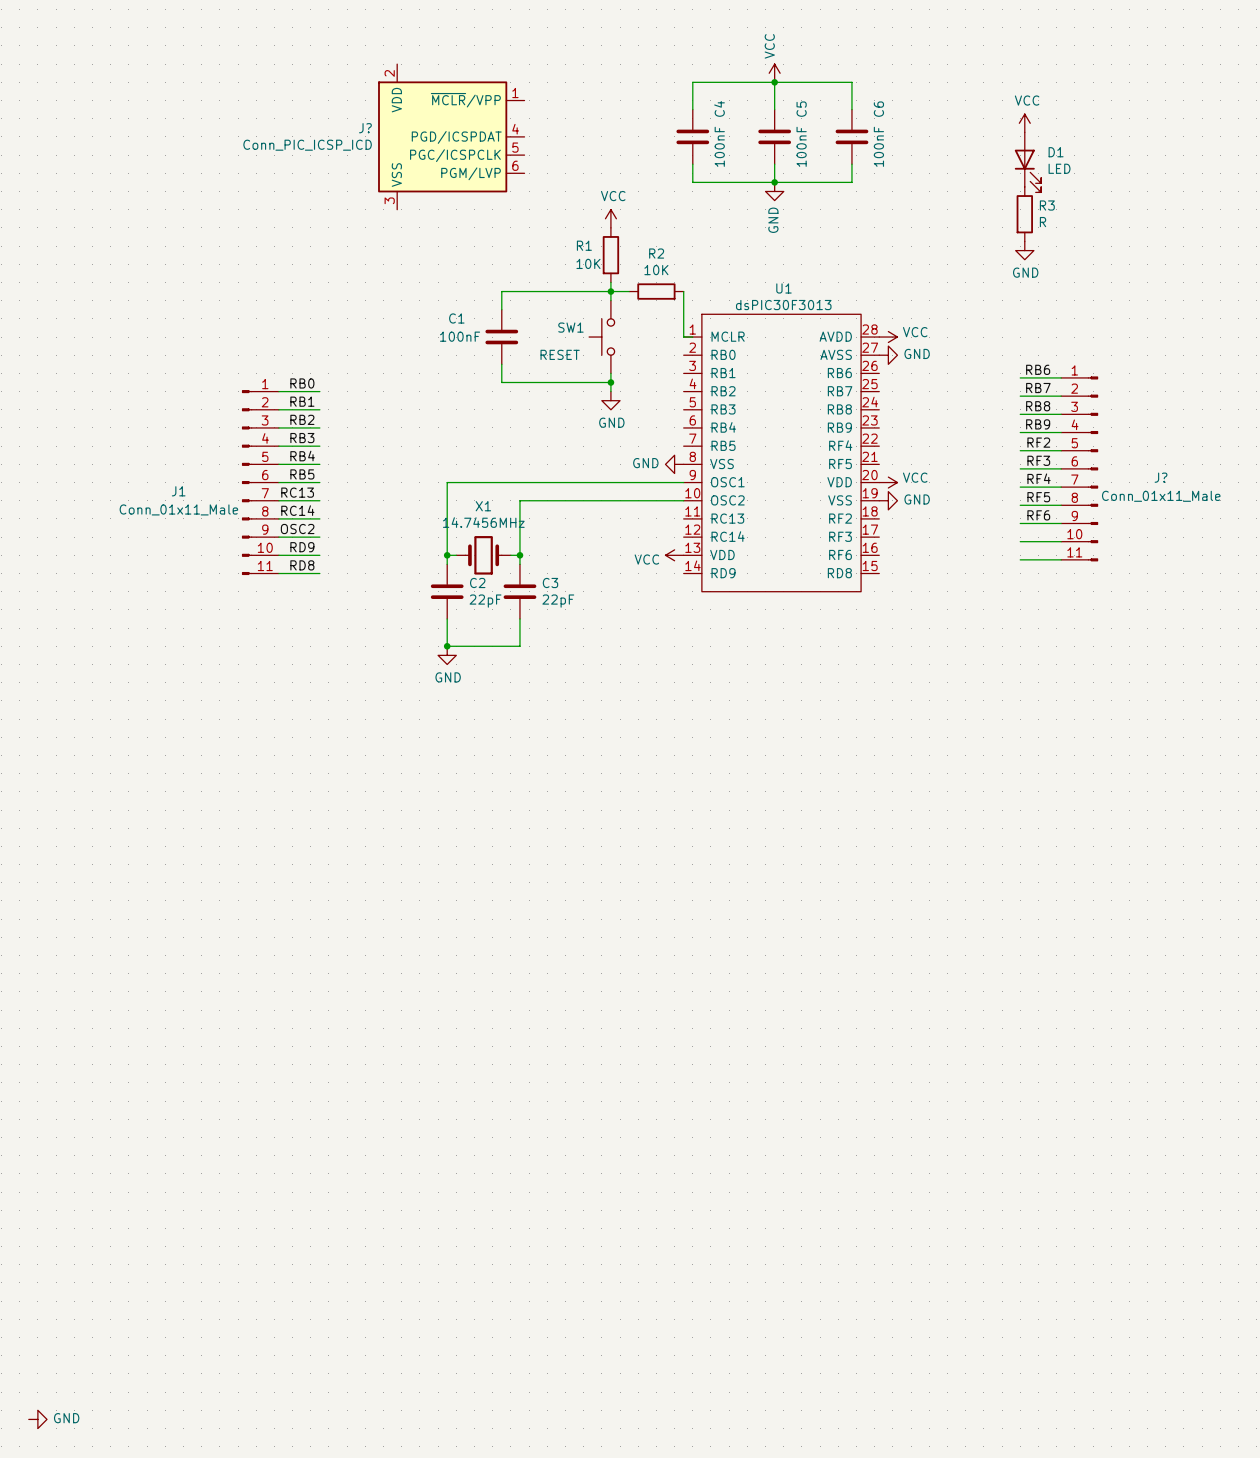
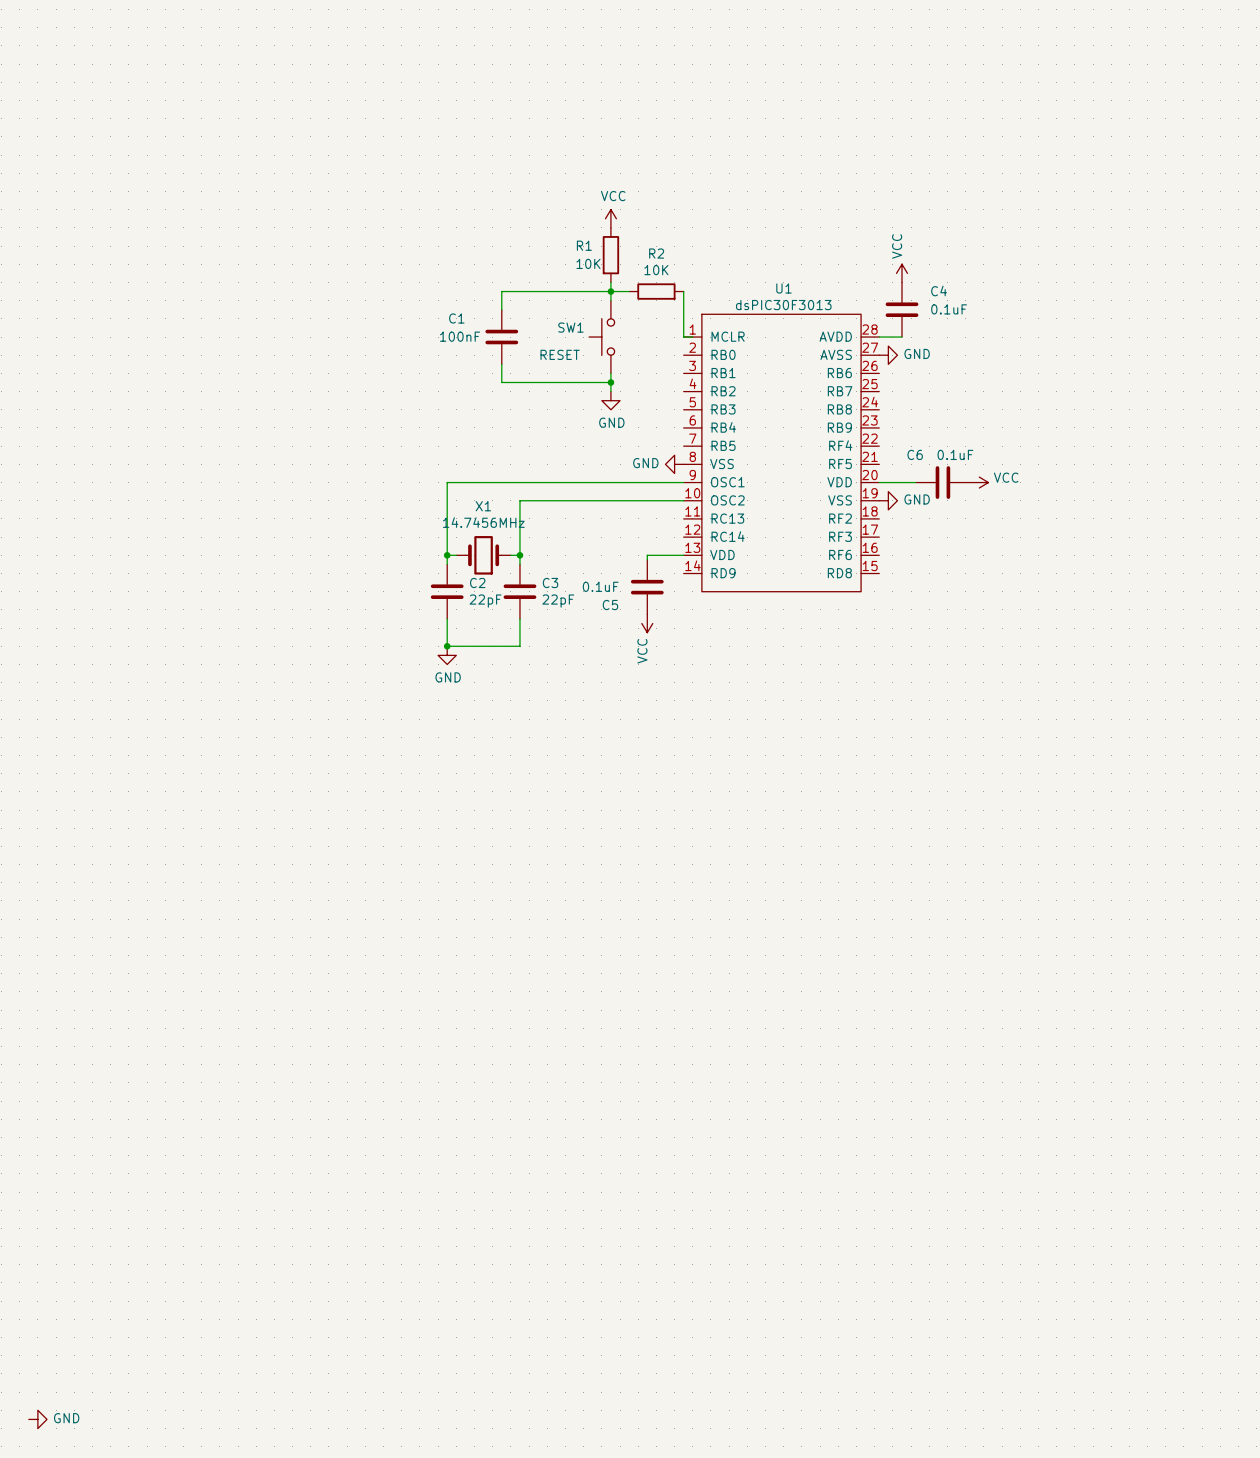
power symbol: VCC (774, 73) -> none
wire: (774, 82) (774, 109) -> none
junction: (774, 82) -> none
C4 name rotation: 0° (719, 108) -> 90° clockwise (939, 290)
wire: (692, 109) (692, 82) (851, 82) (851, 109) -> none
C5 name rotation: 0° (801, 109) -> 90° clockwise (610, 605)
C5 name position: C5 (801, 109) -> C5 (610, 605)
C6 name position: C6 (878, 109) -> C6 (915, 454)
power symbol: VCC (1024, 123) -> none
J?: Conn_PIC_ICSP_ICD (451, 136) -> none
C4 position: (692, 136) -> (902, 309)
C5 position: (774, 136) -> (647, 587)
C6 rotation: 0° (851, 136) -> 90° clockwise (942, 482)
C6 position: (851, 136) -> (942, 482)
C4 value: 100nF (719, 146) -> 0.1uF (949, 309)
C5 value: 100nF (801, 146) -> 0.1uF (600, 586)
C6 value: 100nF (878, 146) -> 0.1uF (955, 454)
D1: LED (1027, 162) -> none
wire: (692, 164) (692, 182) (851, 182) (851, 164) -> none
wire: (774, 164) (774, 182) -> none
junction: (774, 182) -> none
power symbol: GND (774, 191) -> none
R3: R (1024, 214) -> none
power symbol: GND (1024, 250) -> none
power symbol rotation: 0° (888, 337) -> 90° counterclockwise (902, 273)
power symbol position: VCC (888, 337) -> VCC (902, 273)
label: RB6 (1038, 369) -> none
wire: (1020, 377) (1061, 377) -> none
label: RB0 (302, 383) -> none
label: RB7 (1038, 388) -> none
wire: (278, 391) (319, 391) -> none
wire: (1020, 396) (1061, 396) -> none
label: RB1 (302, 401) -> none
label: RB8 (1038, 406) -> none
wire: (278, 409) (319, 409) -> none
wire: (1020, 414) (1061, 414) -> none
label: RB2 (302, 419) -> none
label: RB9 (1038, 424) -> none
wire: (278, 427) (319, 427) -> none
wire: (1020, 432) (1061, 432) -> none
label: RB3 (302, 438) -> none
label: RF2 (1038, 442) -> none
wire: (278, 446) (319, 446) -> none
wire: (1020, 450) (1061, 450) -> none
label: RB4 (302, 456) -> none
label: RF3 (1038, 460) -> none
wire: (278, 464) (319, 464) -> none
wire: (1020, 468) (1061, 468) -> none
J?: Conn_01x11_Male (1079, 468) -> none
label: RB5 (302, 474) -> none
label: RF4 (1039, 478) -> none
J1: Conn_01x11_Male (260, 482) -> none
wire: (278, 482) (319, 482) -> none
power symbol: VCC (888, 482) -> none
power symbol: none -> VCC (979, 482)
wire: (1020, 487) (1061, 487) -> none
label: RC13 (297, 492) -> none
label: RF5 (1038, 497) -> none
wire: (278, 500) (319, 500) -> none
wire: (1020, 505) (1061, 505) -> none
label: RC14 (297, 510) -> none
label: RF6 (1038, 515) -> none
wire: (278, 518) (319, 518) -> none
wire: (1020, 523) (1061, 523) -> none
label: OSC2 (297, 529) -> none
wire: (278, 537) (319, 537) -> none
wire: (1020, 541) (1061, 541) -> none
label: RD9 (302, 547) -> none
wire: (278, 555) (319, 555) -> none
power symbol rotation: 0° (674, 555) -> 90° counterclockwise (647, 623)
power symbol position: VCC (674, 555) -> VCC (647, 623)
wire: (1020, 559) (1061, 559) -> none
label: RD8 (302, 565) -> none
wire: (278, 573) (319, 573) -> none

